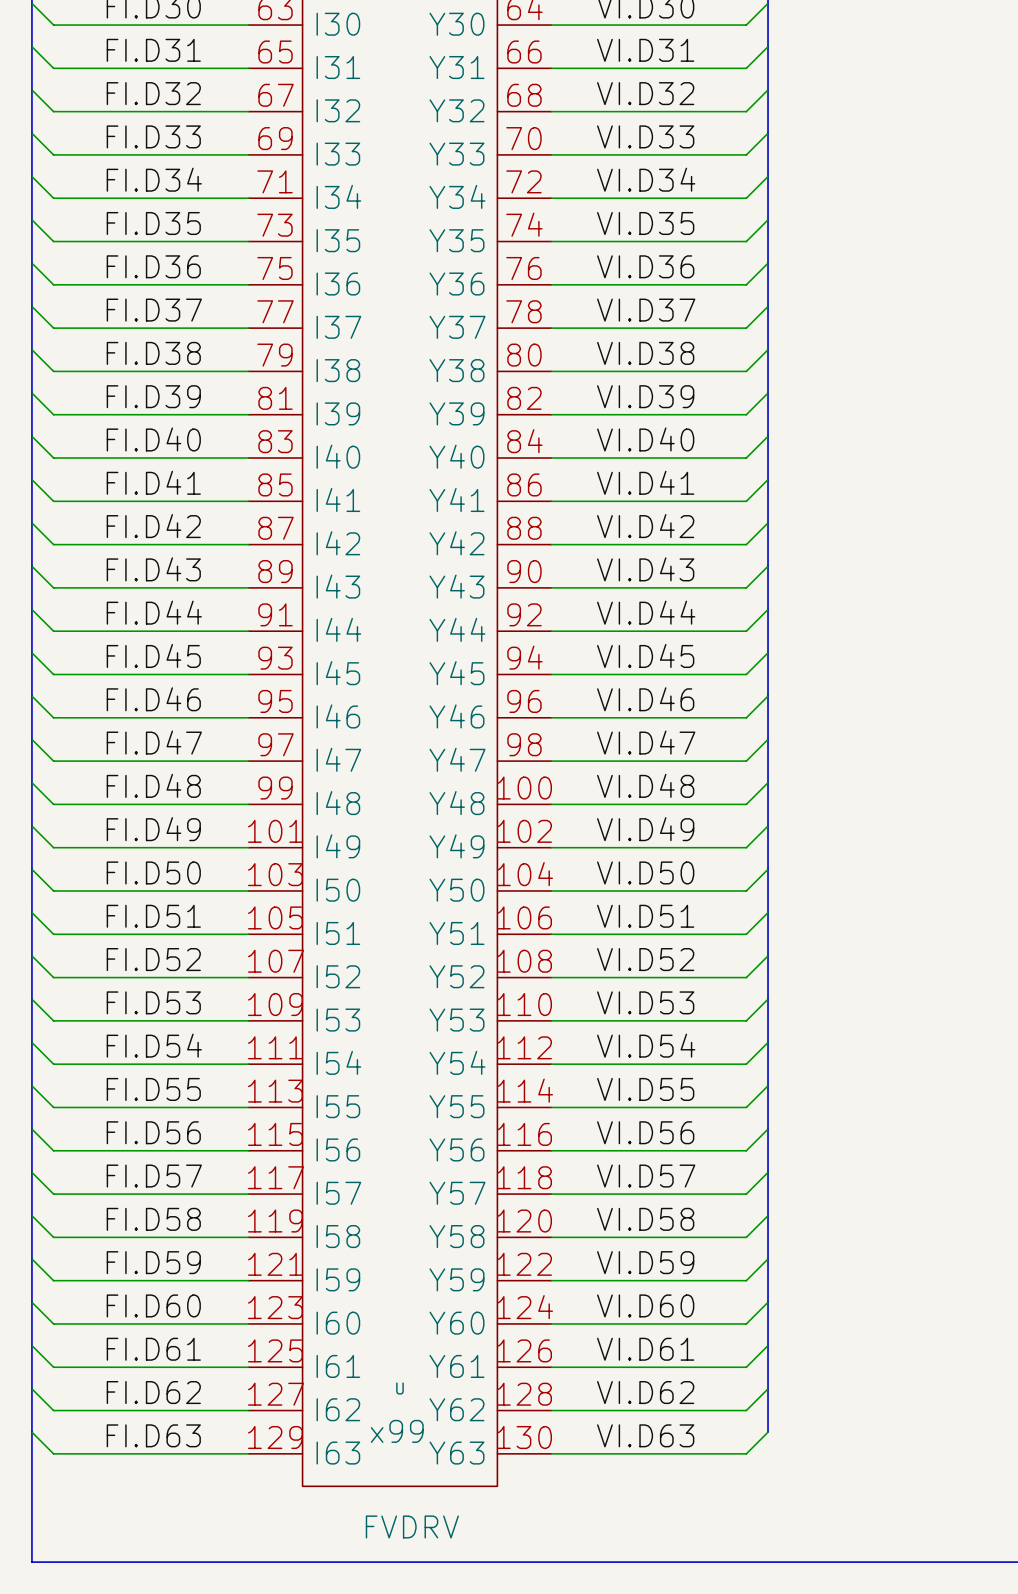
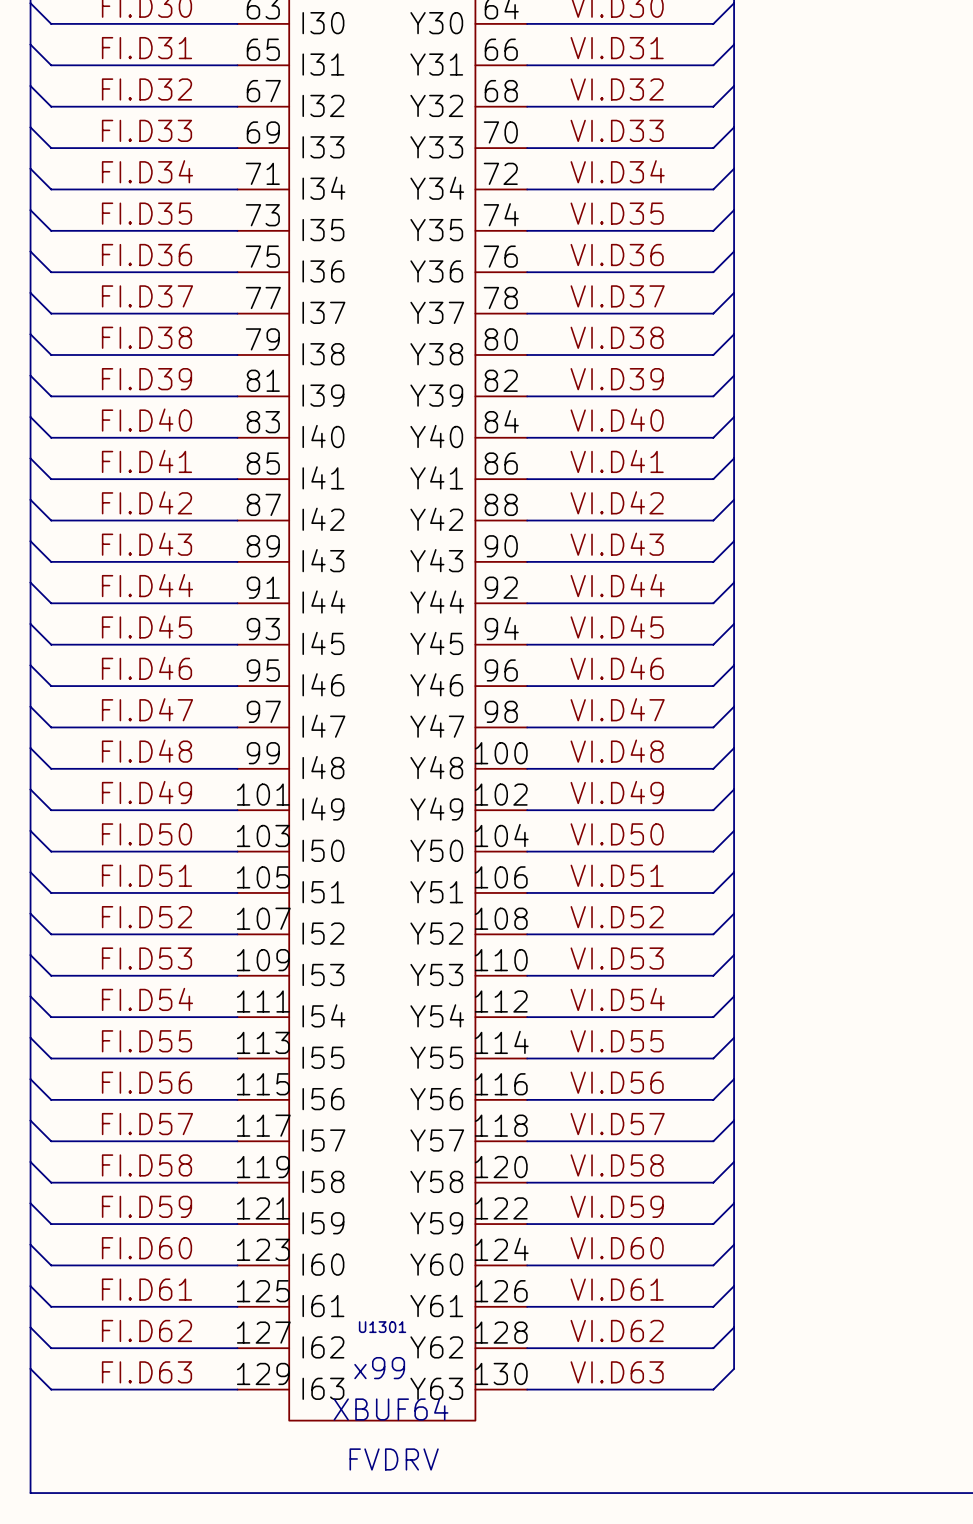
U name: U (399, 1388) -> U1301 (382, 1327)
U value: none -> XBUF64 (391, 1409)

